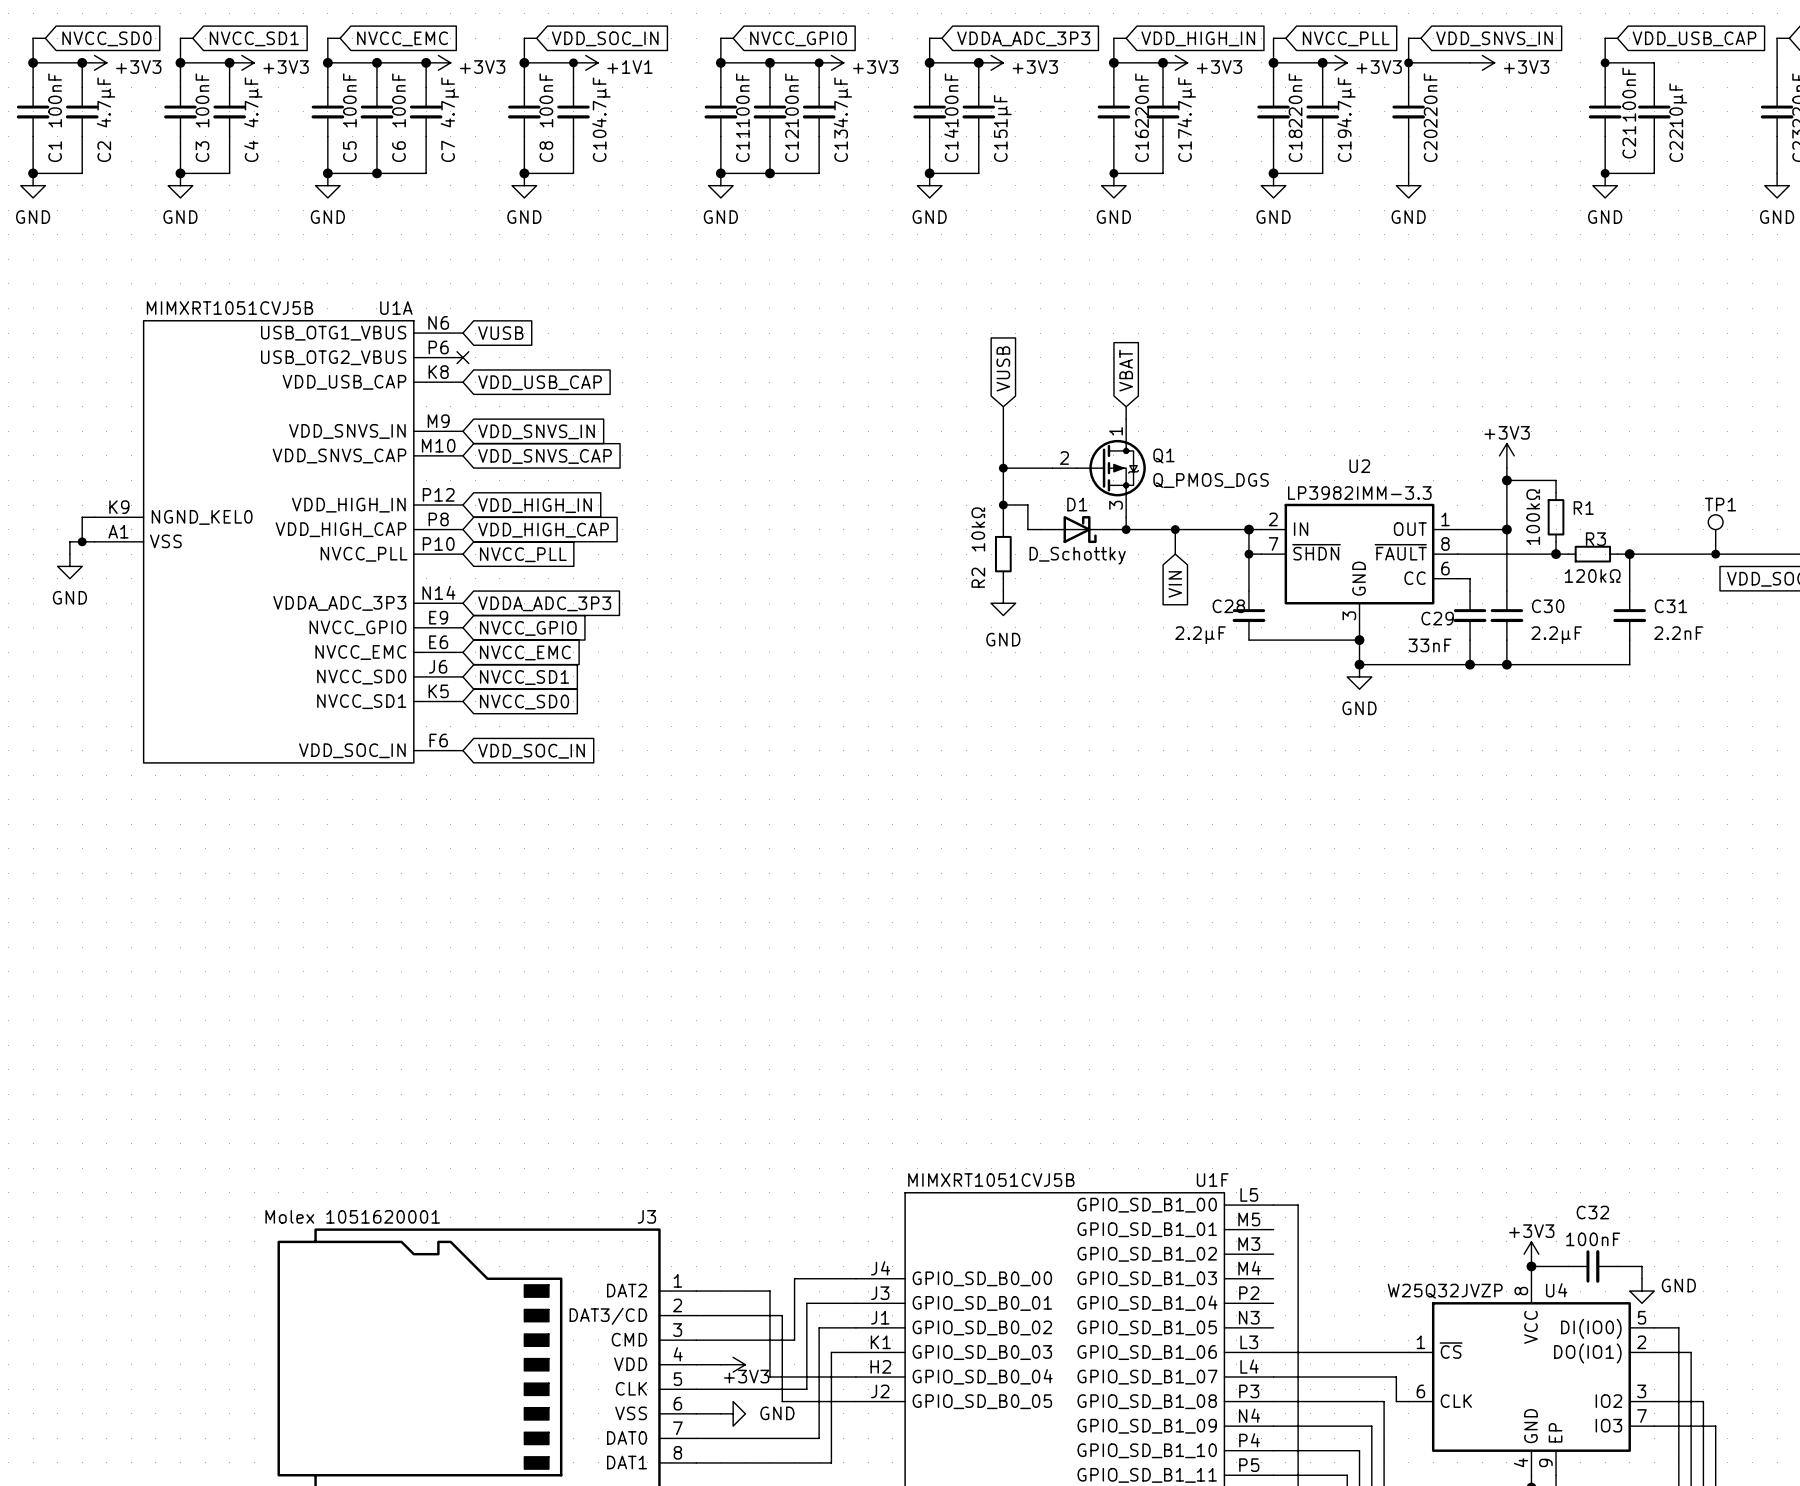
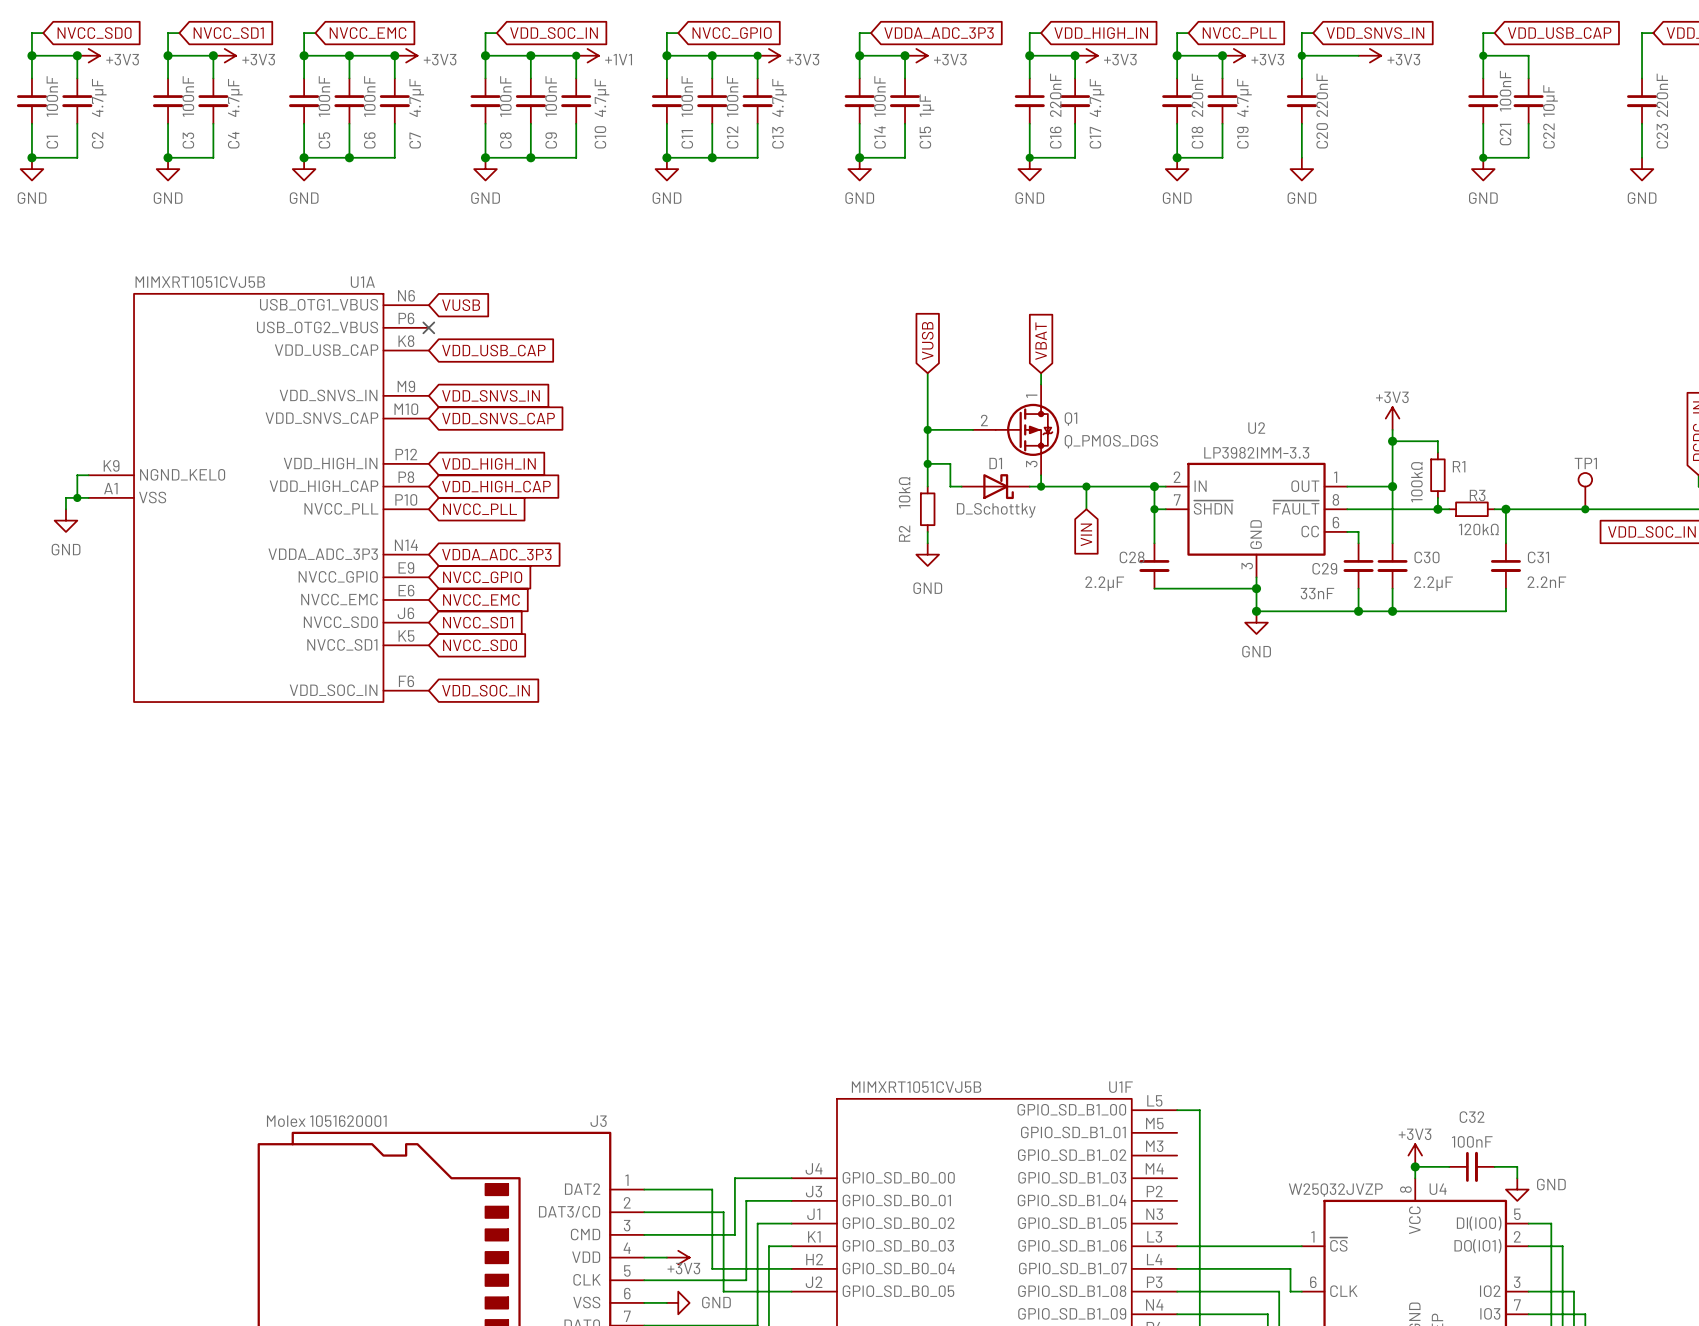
wire: none -> (530, 55) (576, 55) (576, 78)
junction position: (573, 62) -> (576, 55)
junction: none -> (530, 55)
power symbol position: +1V1 (585, 62) -> +1V1 (587, 55)
C10 value: 4.7µF (601, 102) -> 100nF (551, 96)
C10: none -> 4.7µF (576, 101)
wire: none -> (576, 123) (576, 157) (530, 157)
C10 name: C10 (599, 145) -> C9 (551, 140)
junction: none -> (530, 157)

